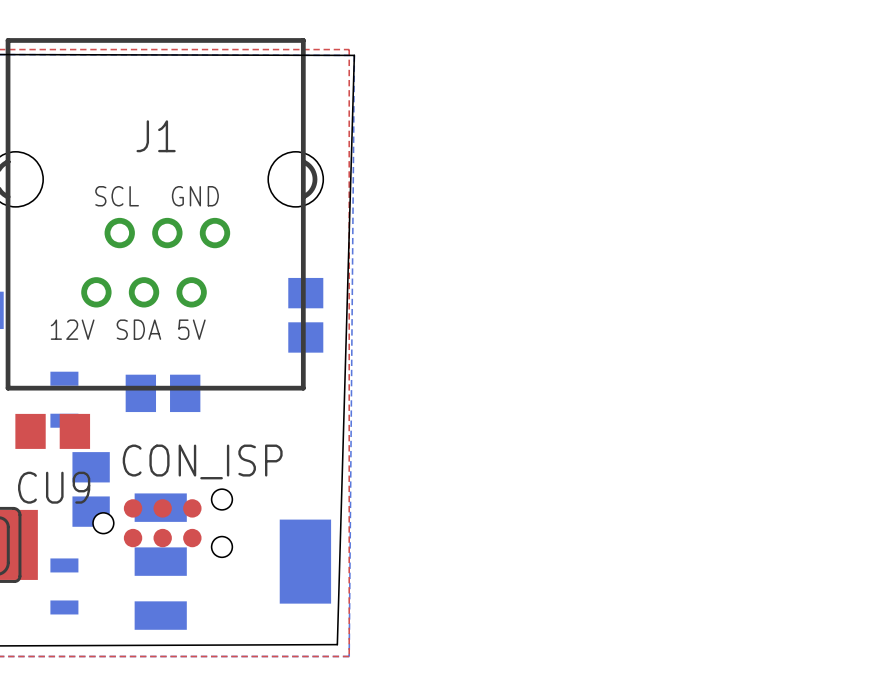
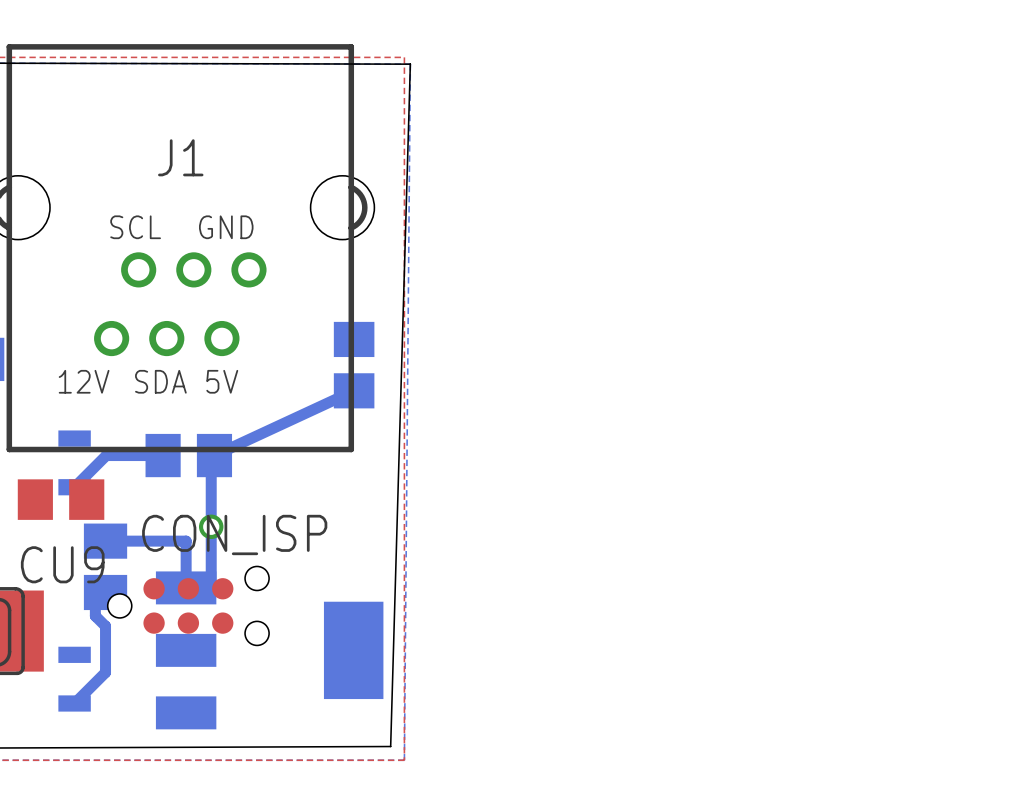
bottom track: none -> (354, 390) (211, 455) (211, 587) (186, 587) (186, 541) (105, 541)
bottom track: none -> (163, 455) (106, 455) (74, 487)
via: none -> (211, 526)
bottom track: none -> (102, 589) (95, 595) (95, 616) (105, 626) (105, 672) (74, 703)

